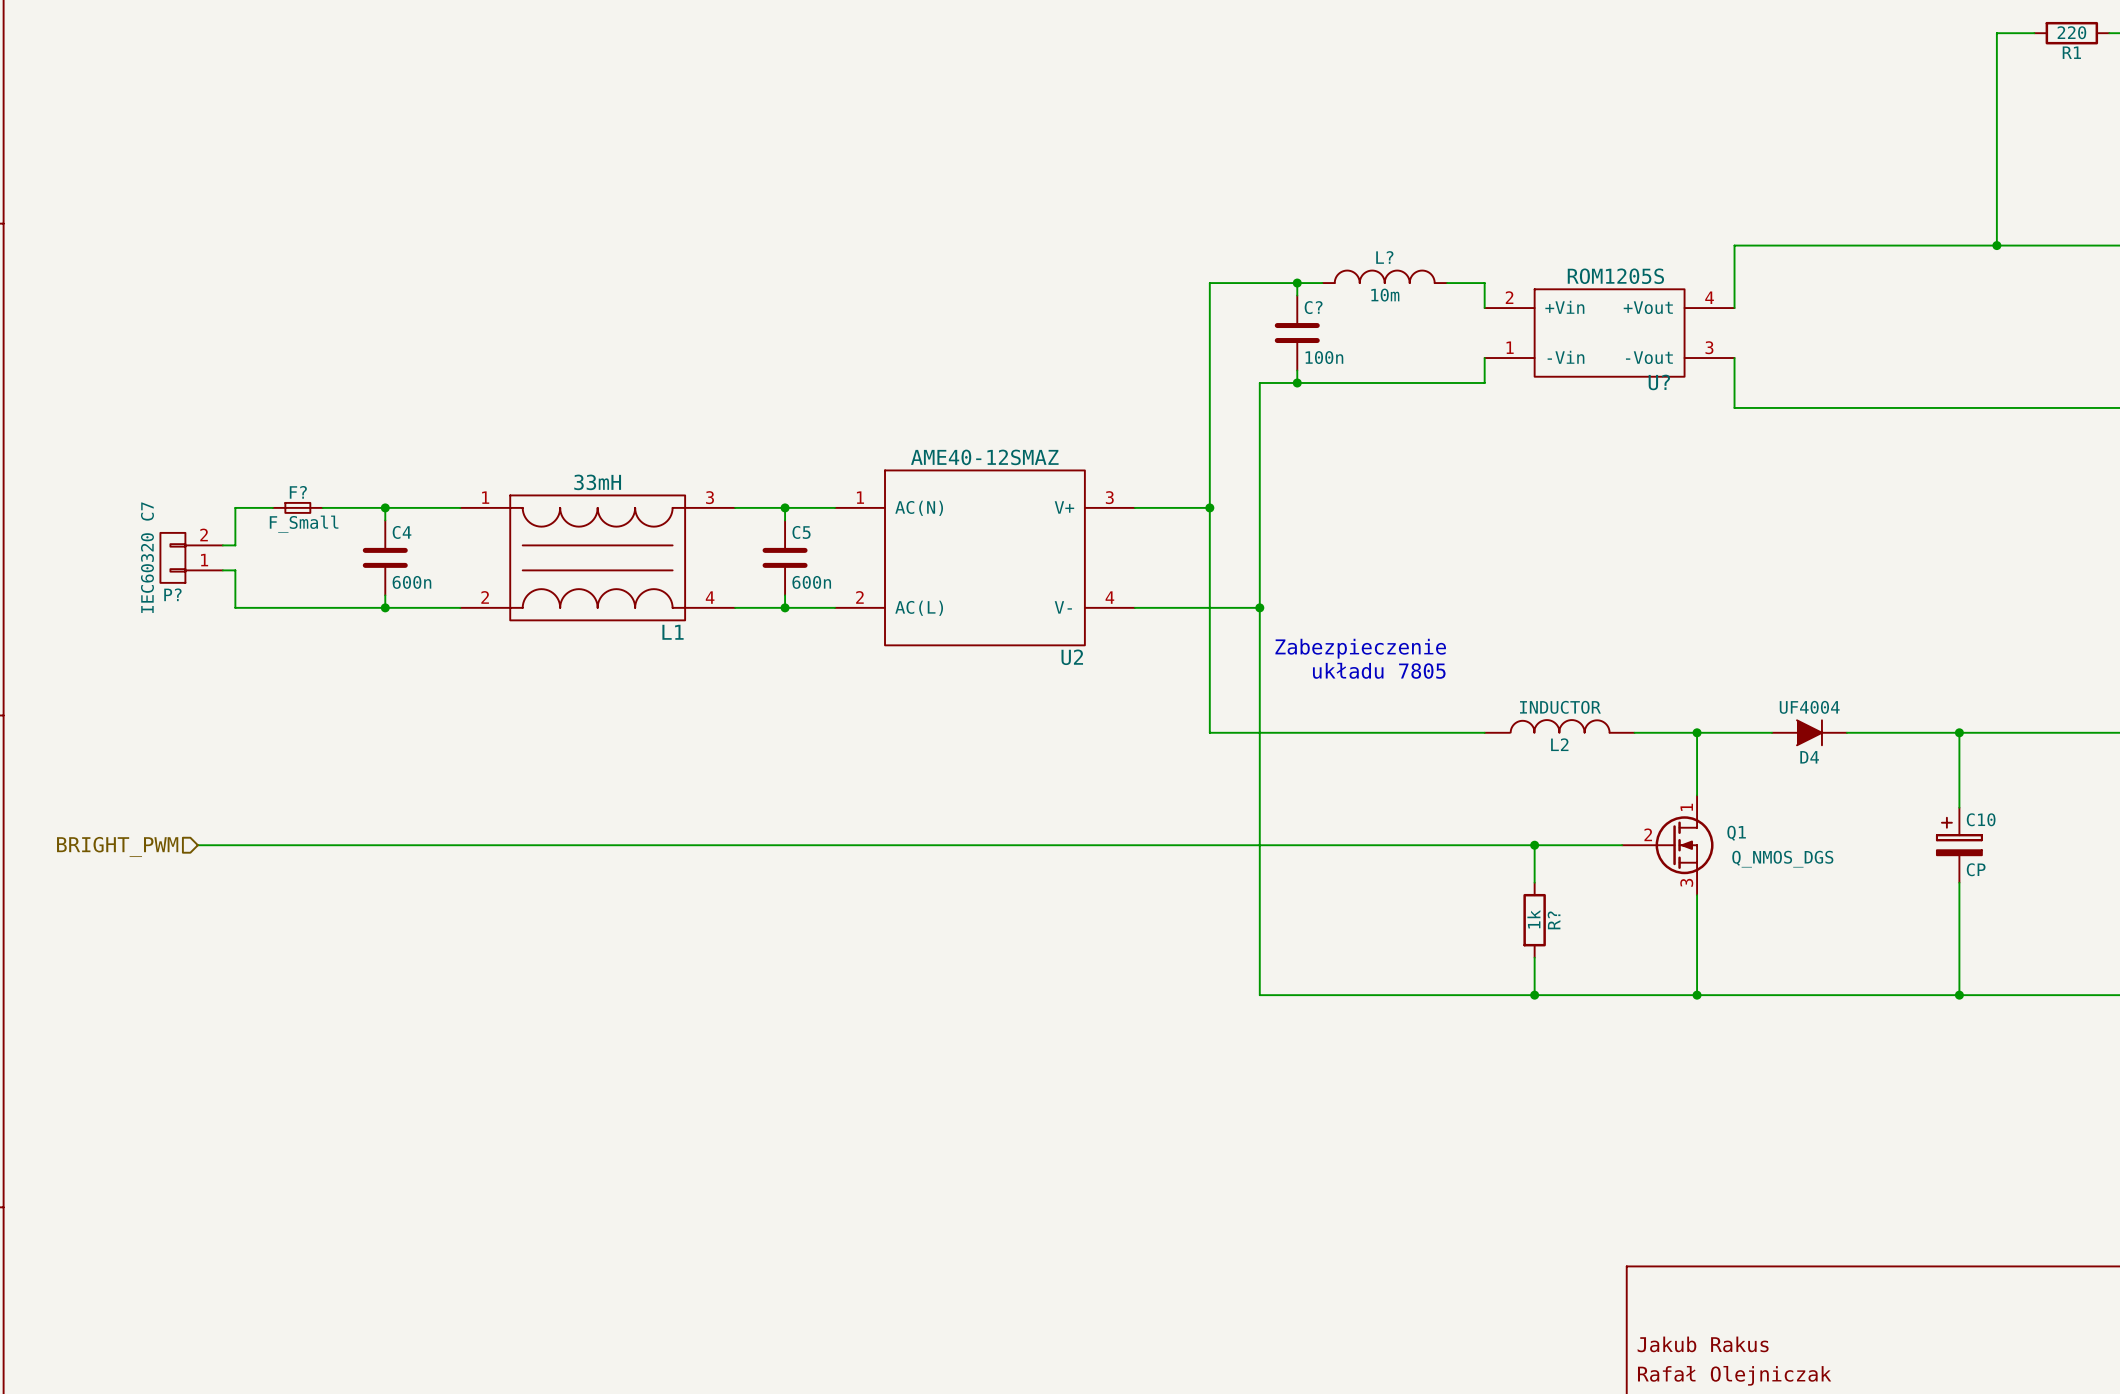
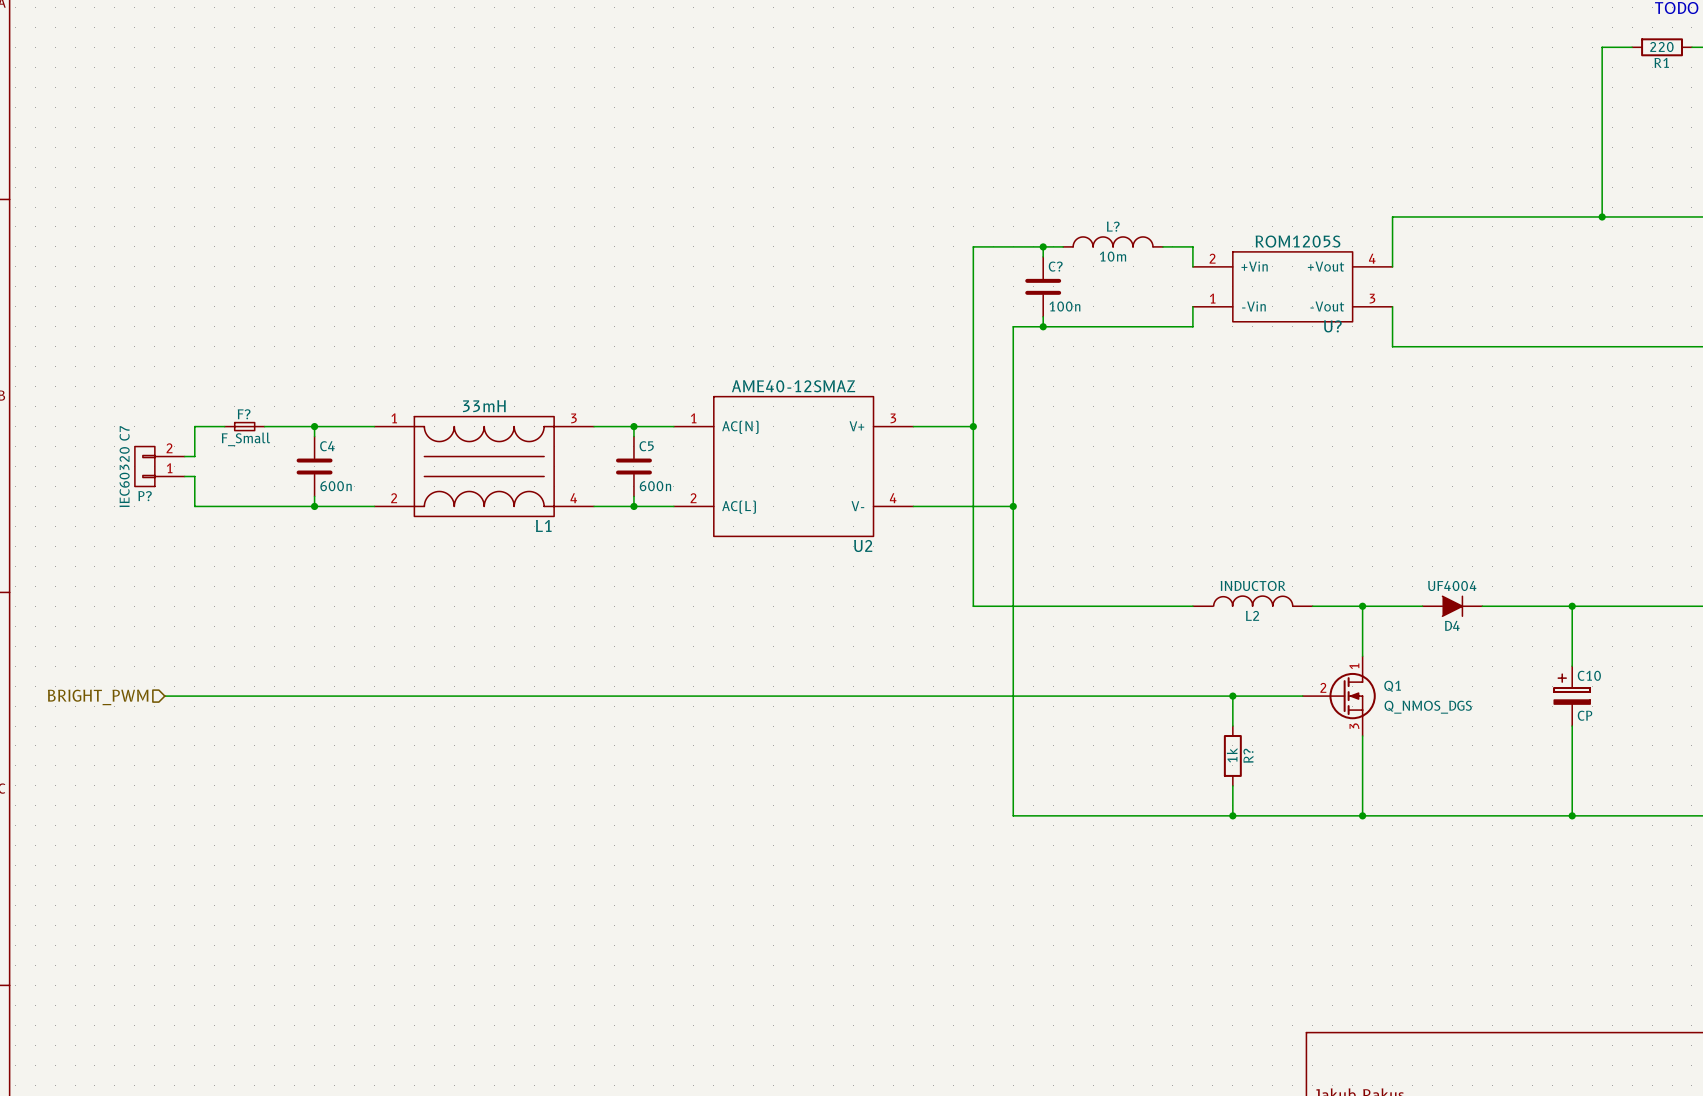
text: Zabezpieczenie (1360, 648) -> none
text: układu 7805 (1379, 670) -> none

